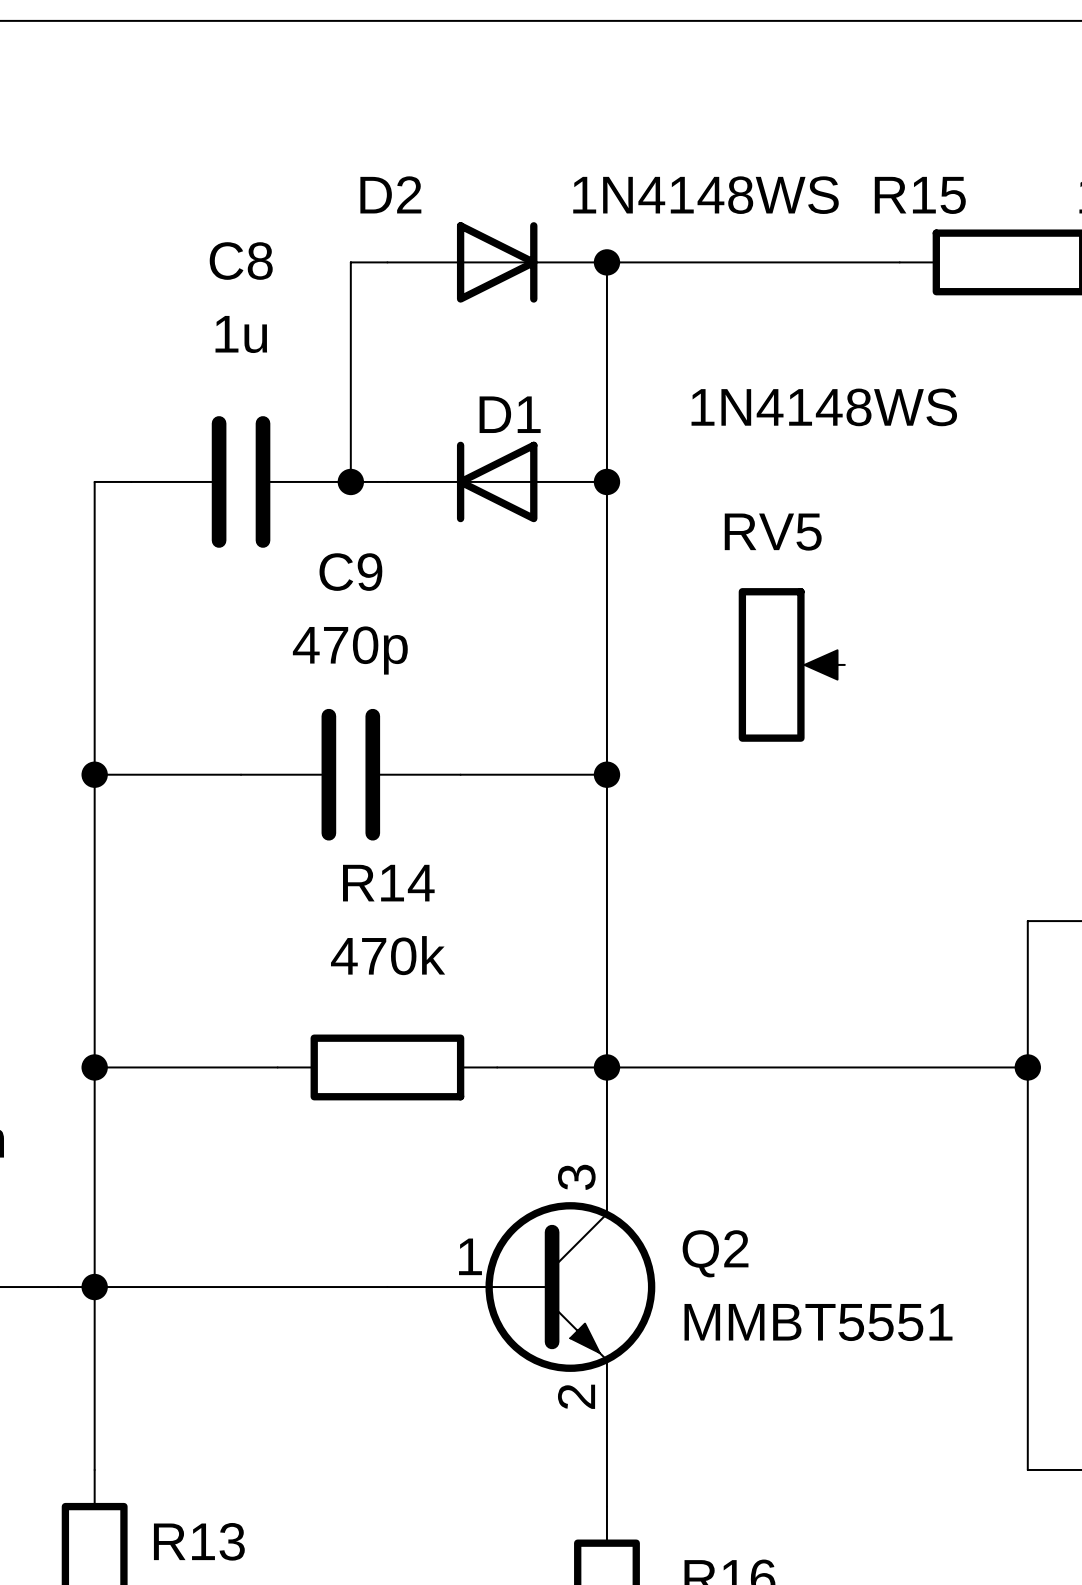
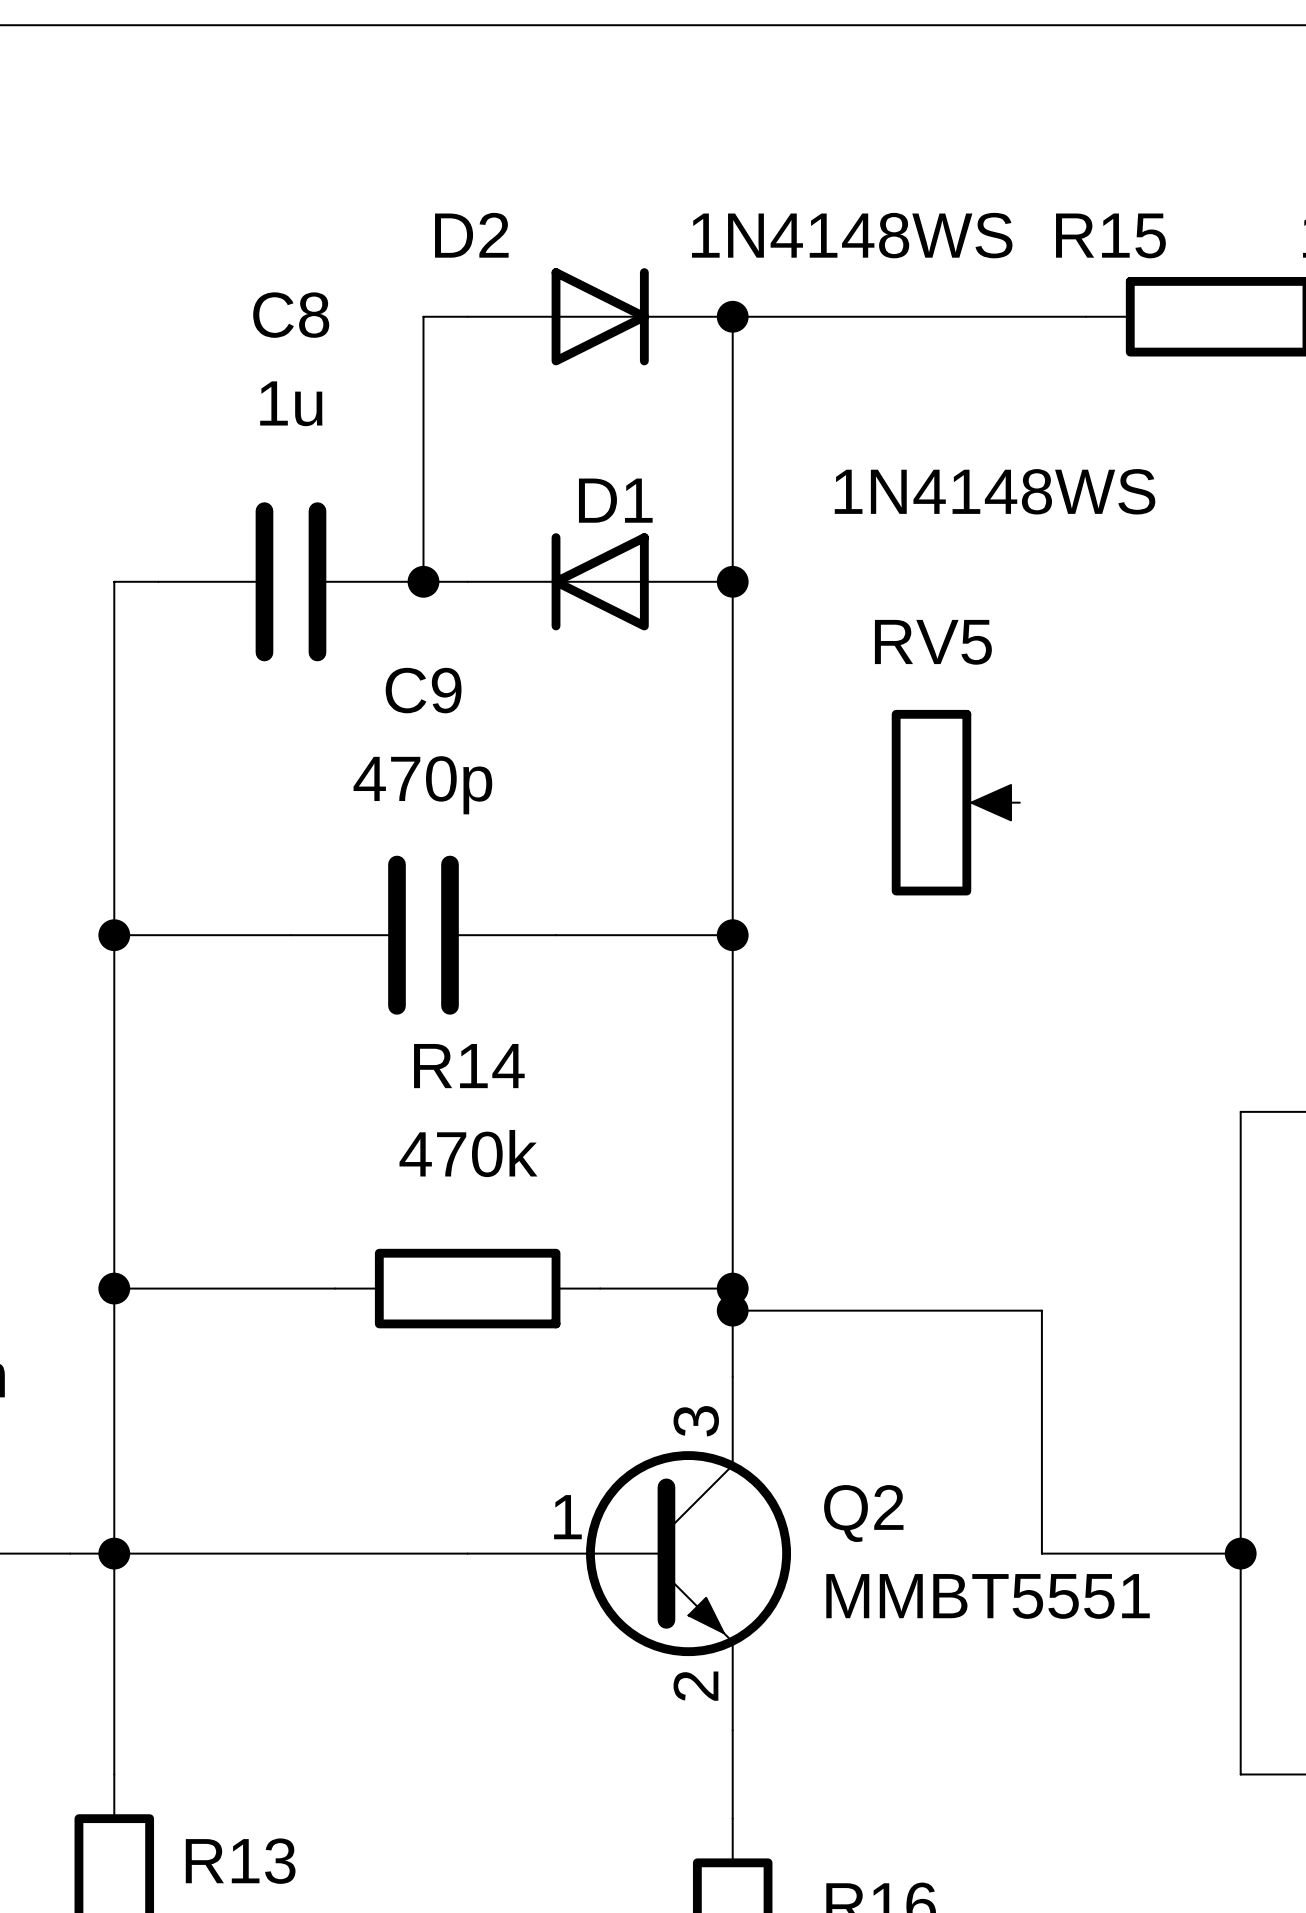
wire: (606, 1067) (1027, 1067) -> none
junction: (1027, 1067) -> none
wire: none -> (732, 1310) (1041, 1310) (1041, 1553) (1240, 1553)
junction: none -> (732, 1310)
junction: none -> (1240, 1553)

